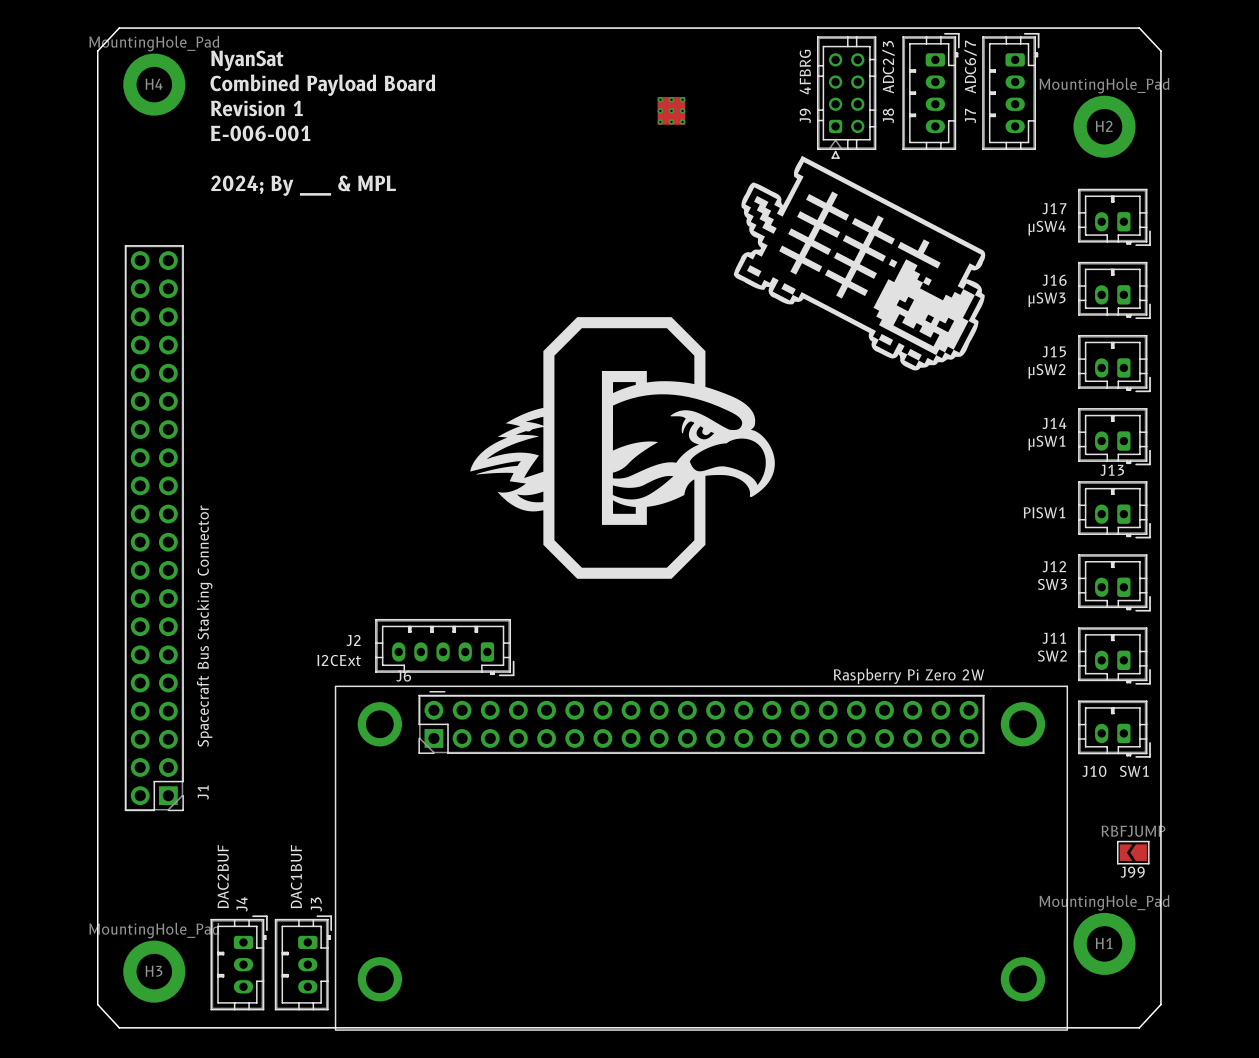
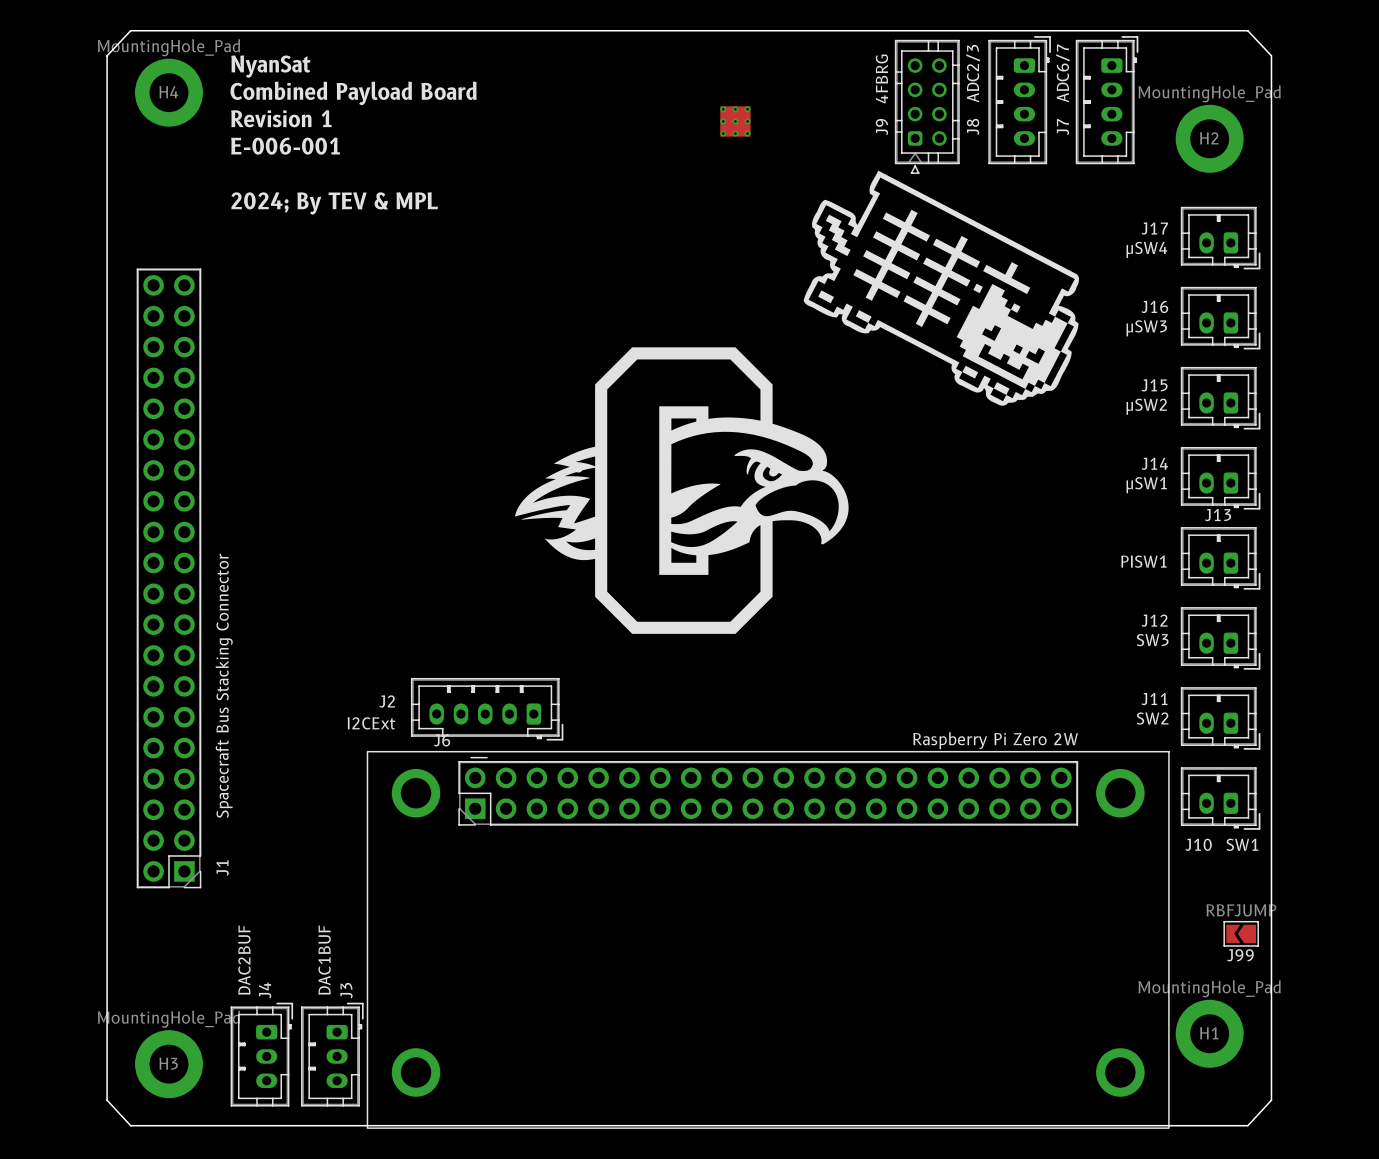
text: 2024; By ___ & MPL (303, 185) -> 2024; By TEV & MPL (334, 203)

